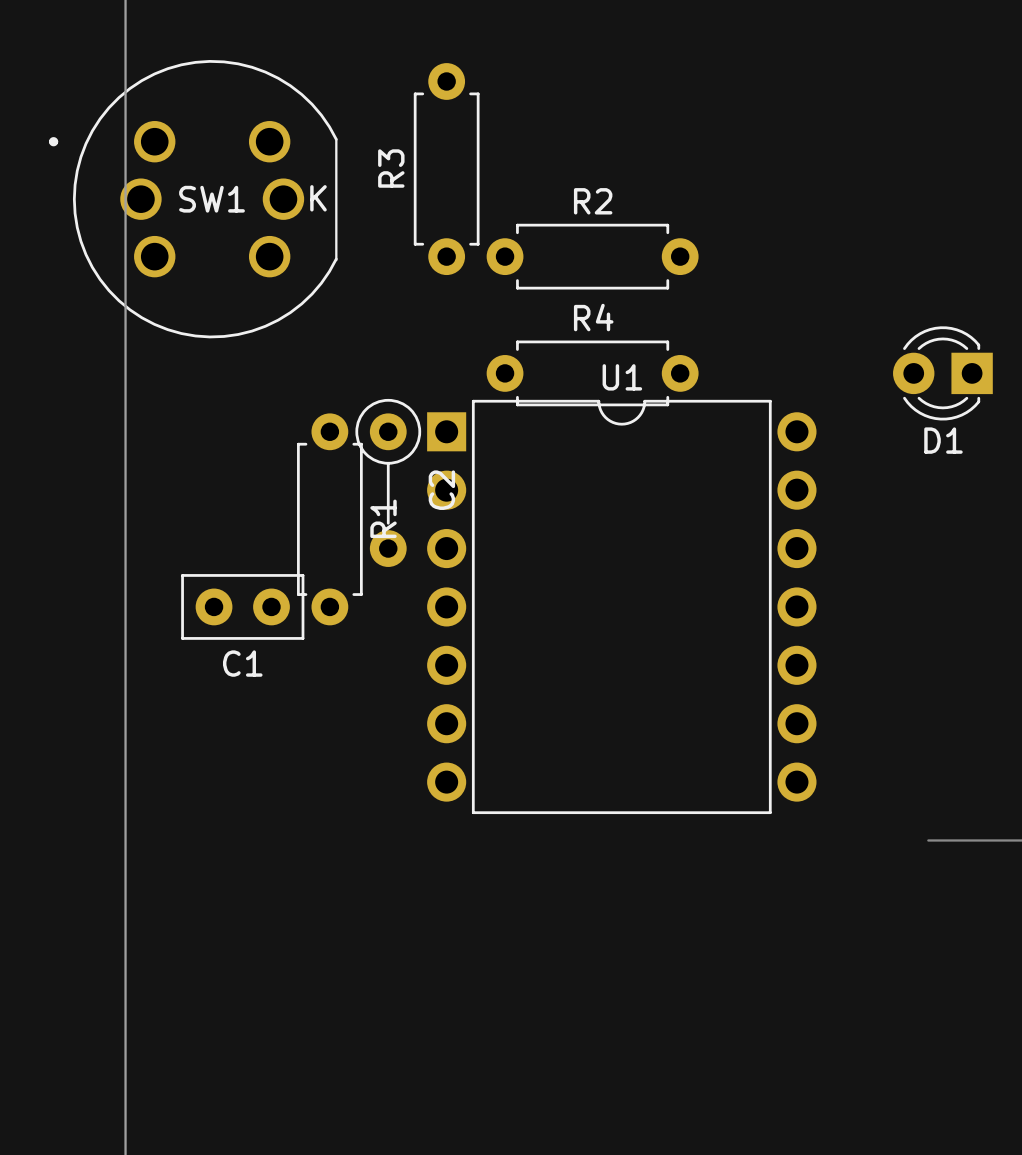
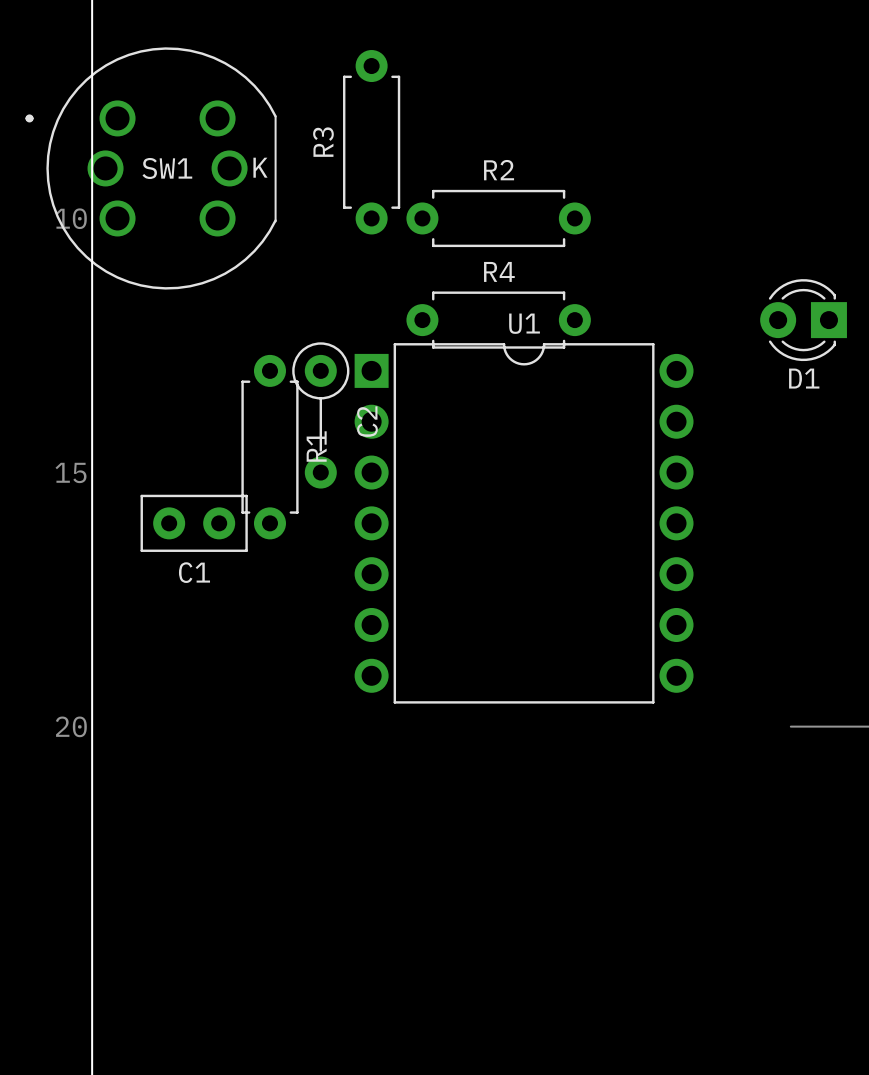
text: none -> 10 (71, 218)
text: none -> 15 (71, 472)
text: none -> 20 (71, 726)

